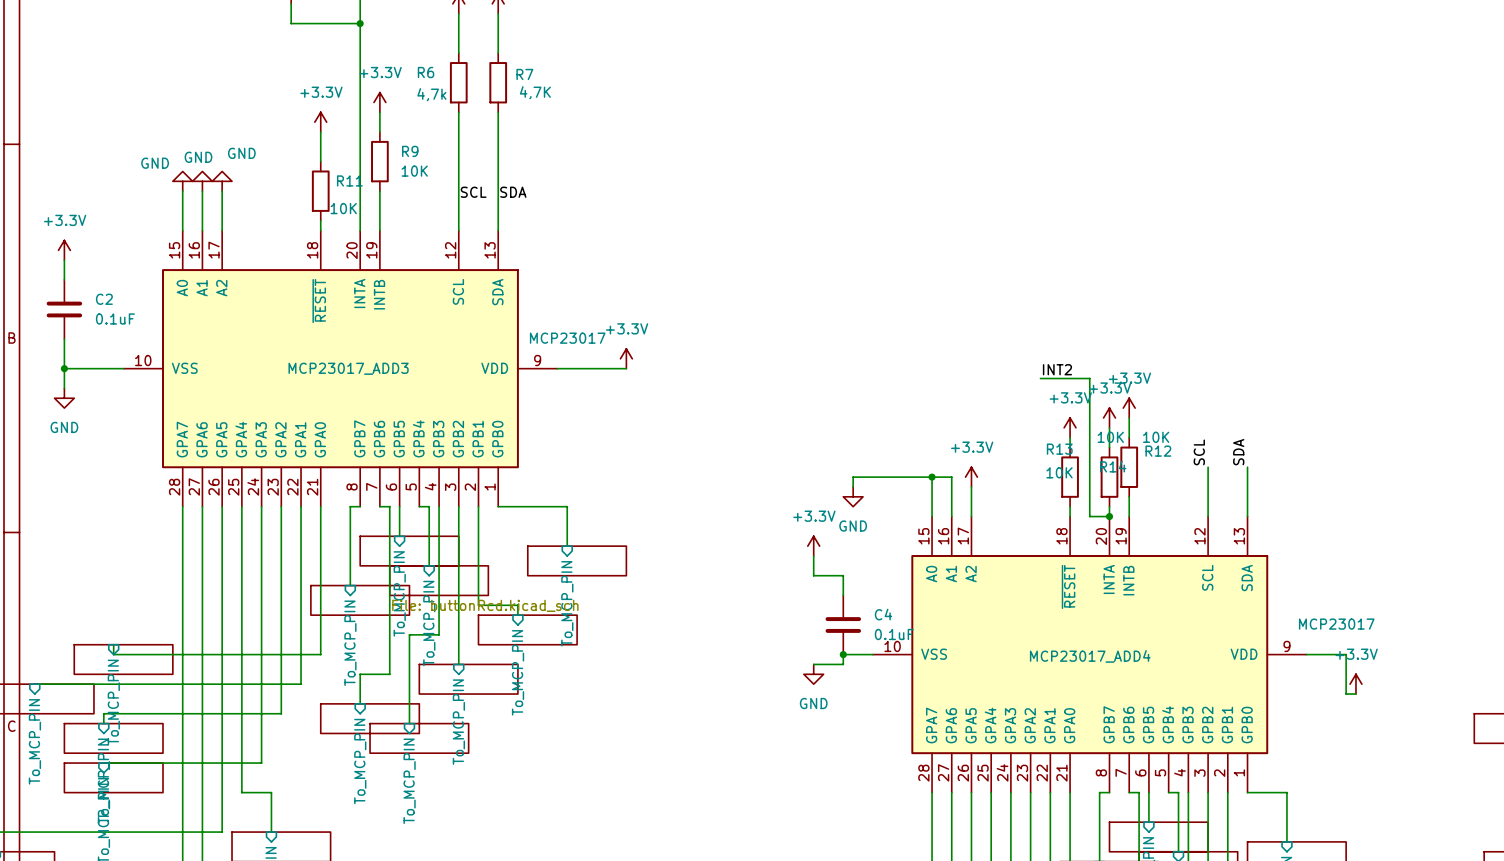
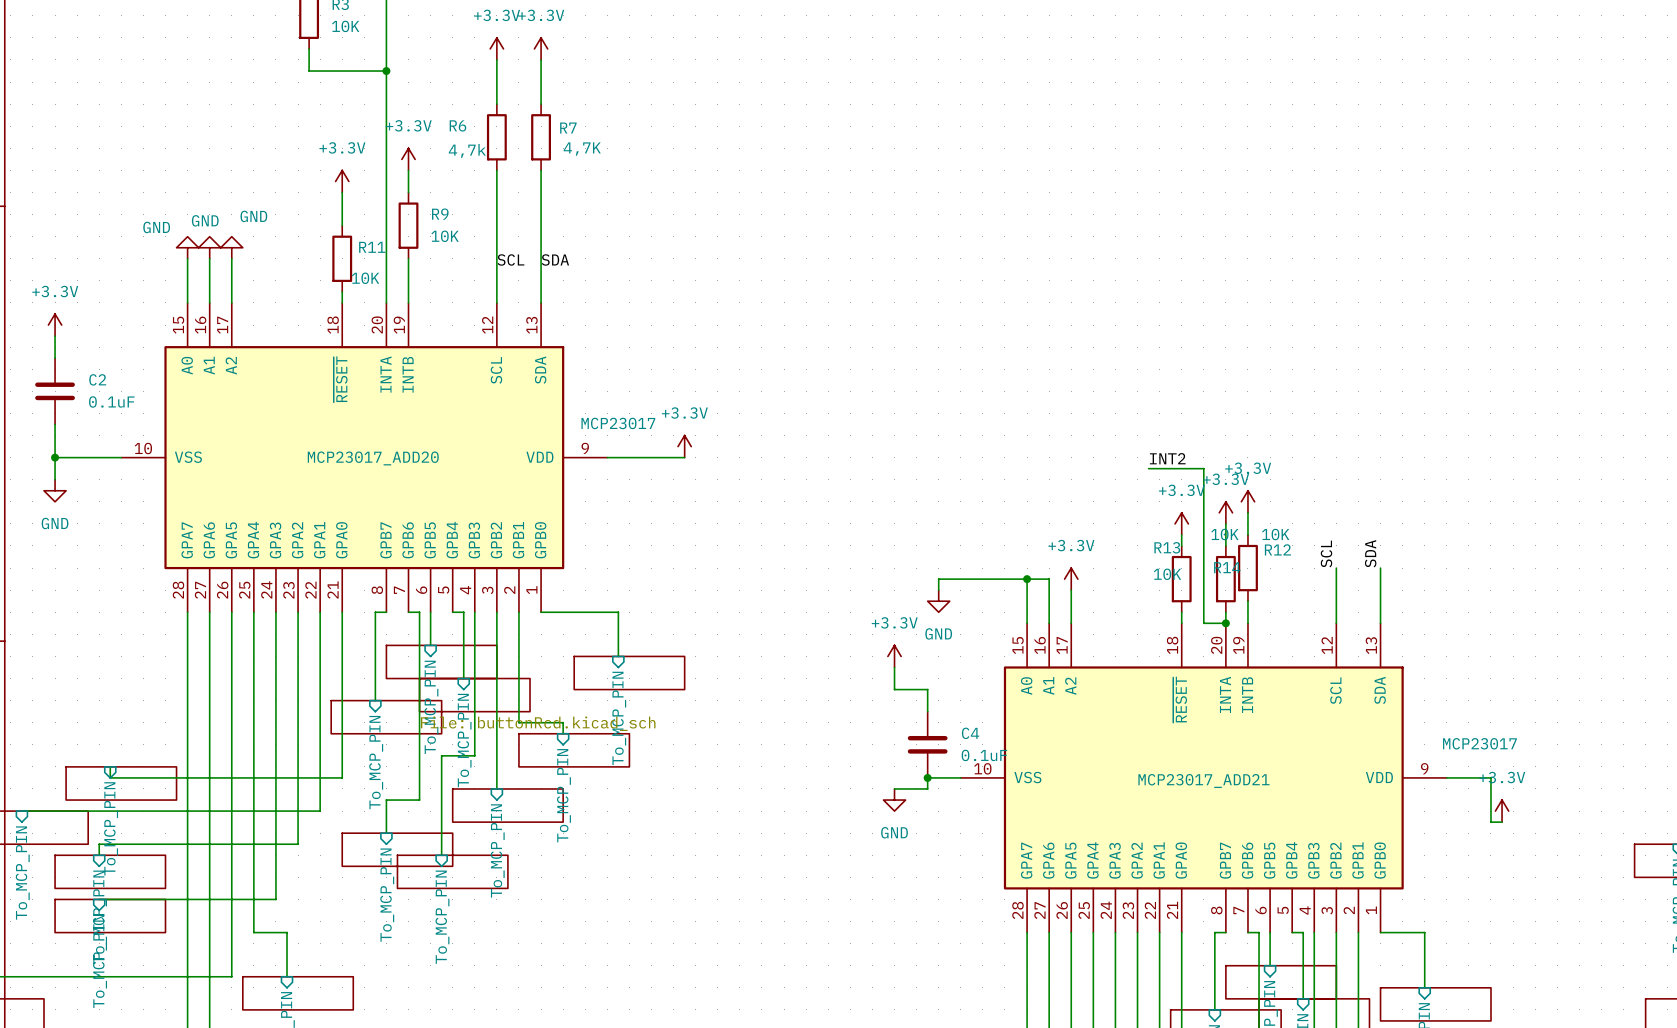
MCP23017_ADD3 name: MCP23017_ADD3 (348, 368) -> MCP23017_ADD20 (373, 458)
MCP23017_ADD4 name: MCP23017_ADD4 (1090, 656) -> MCP23017_ADD21 (1203, 780)

